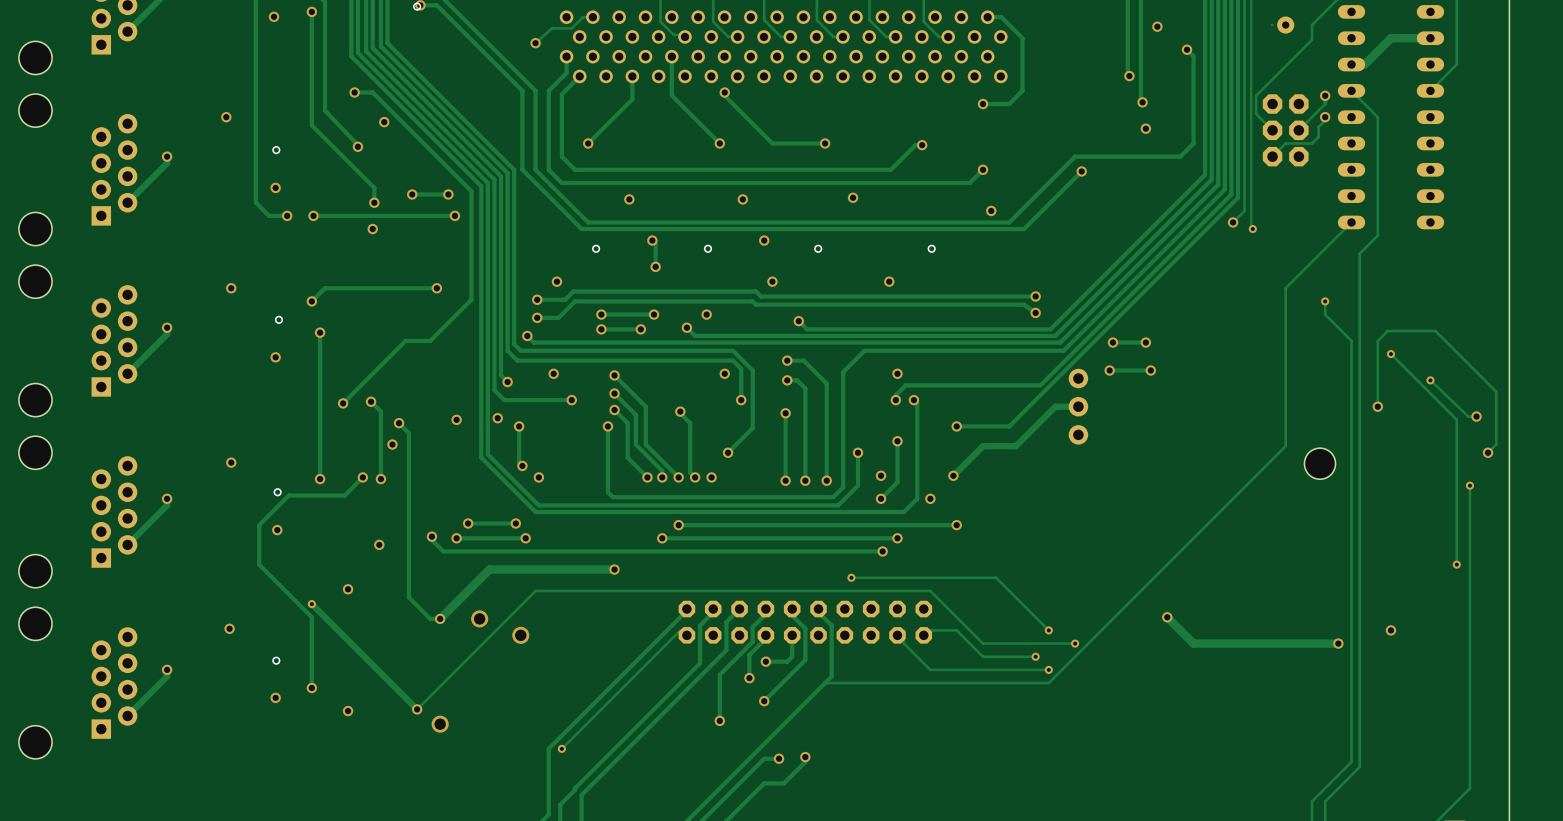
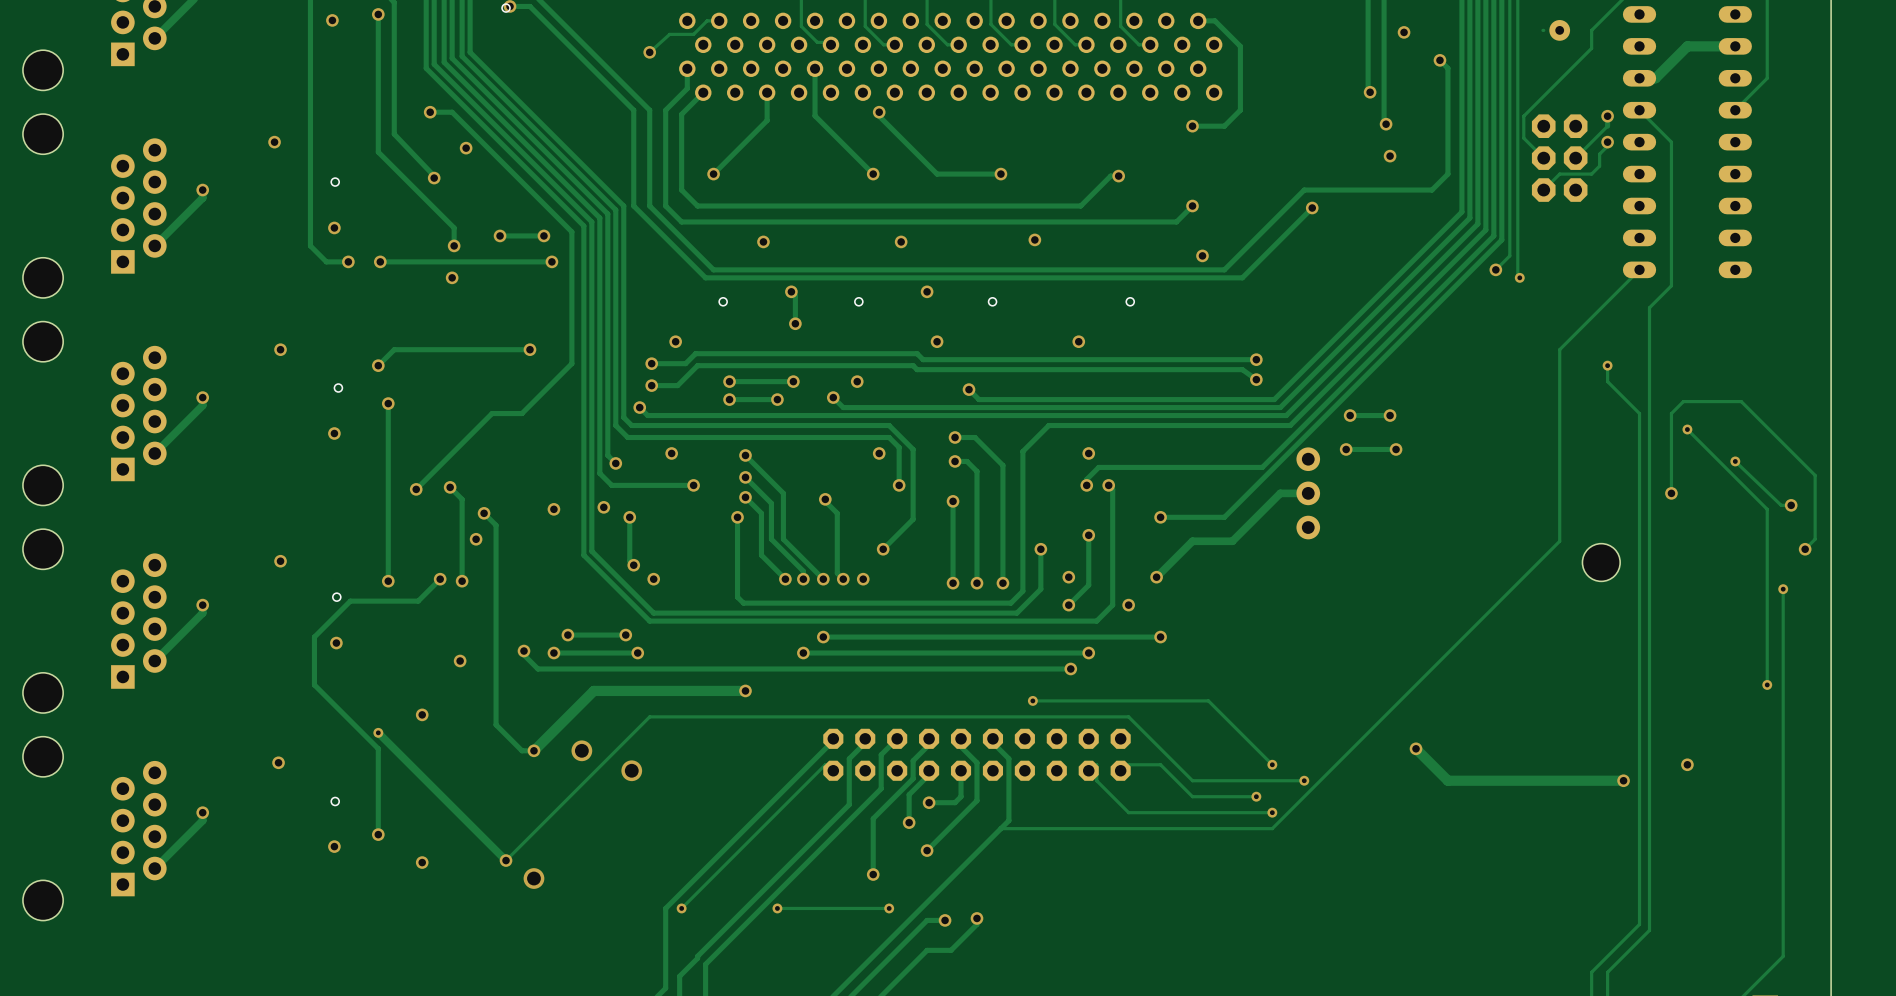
via: none -> (777, 908)
track: none -> (889, 908) (777, 908)
via: none -> (889, 908)

